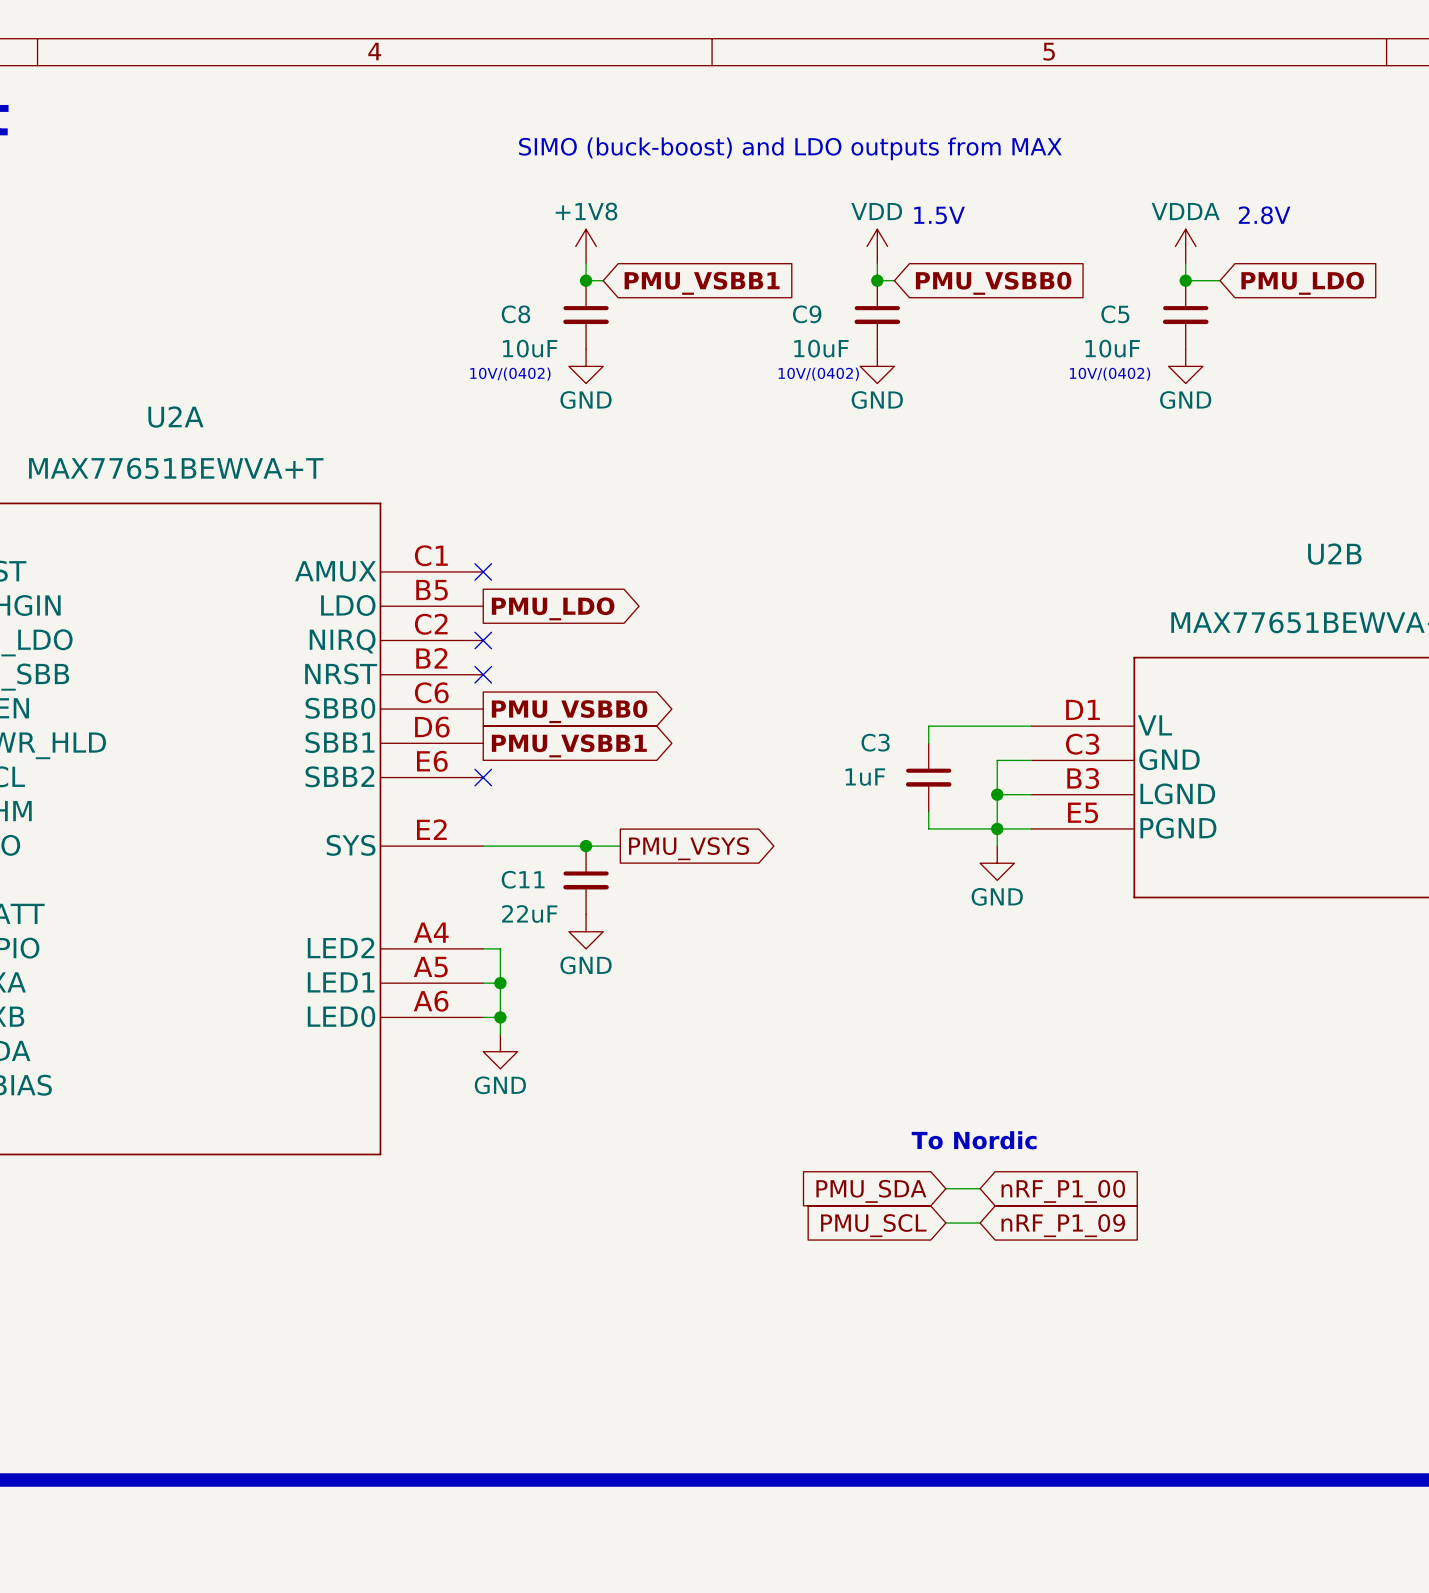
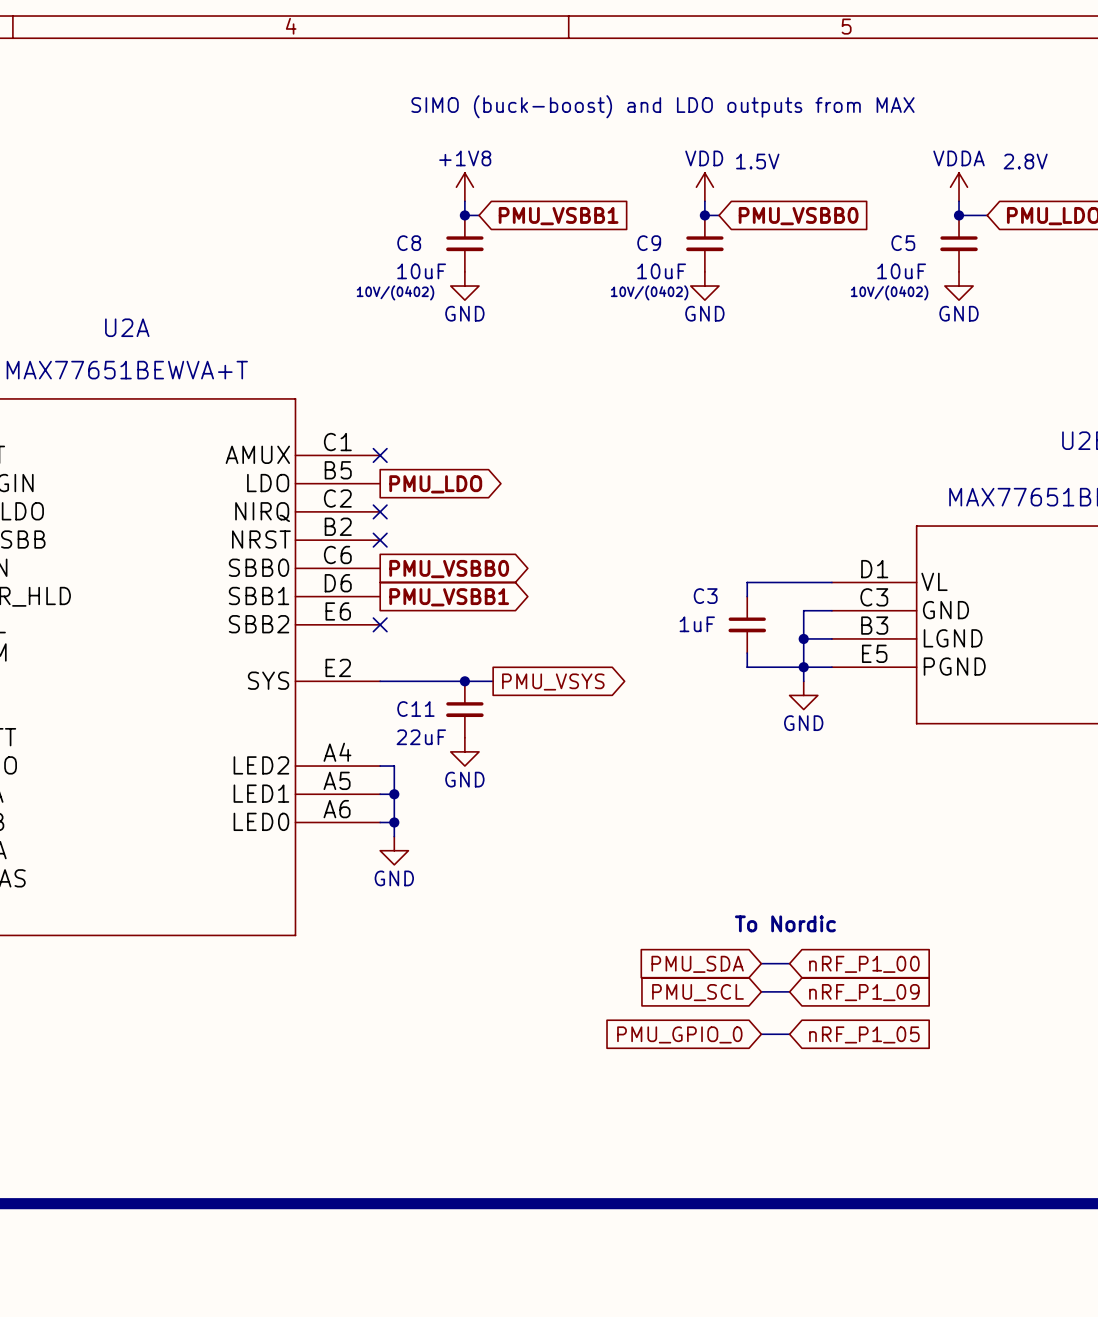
wire: none -> (761, 1034) (789, 1034)
global label: none -> PMU_GPIO_0 (679, 1034)
global label: none -> nRF_P1_05 (864, 1034)

